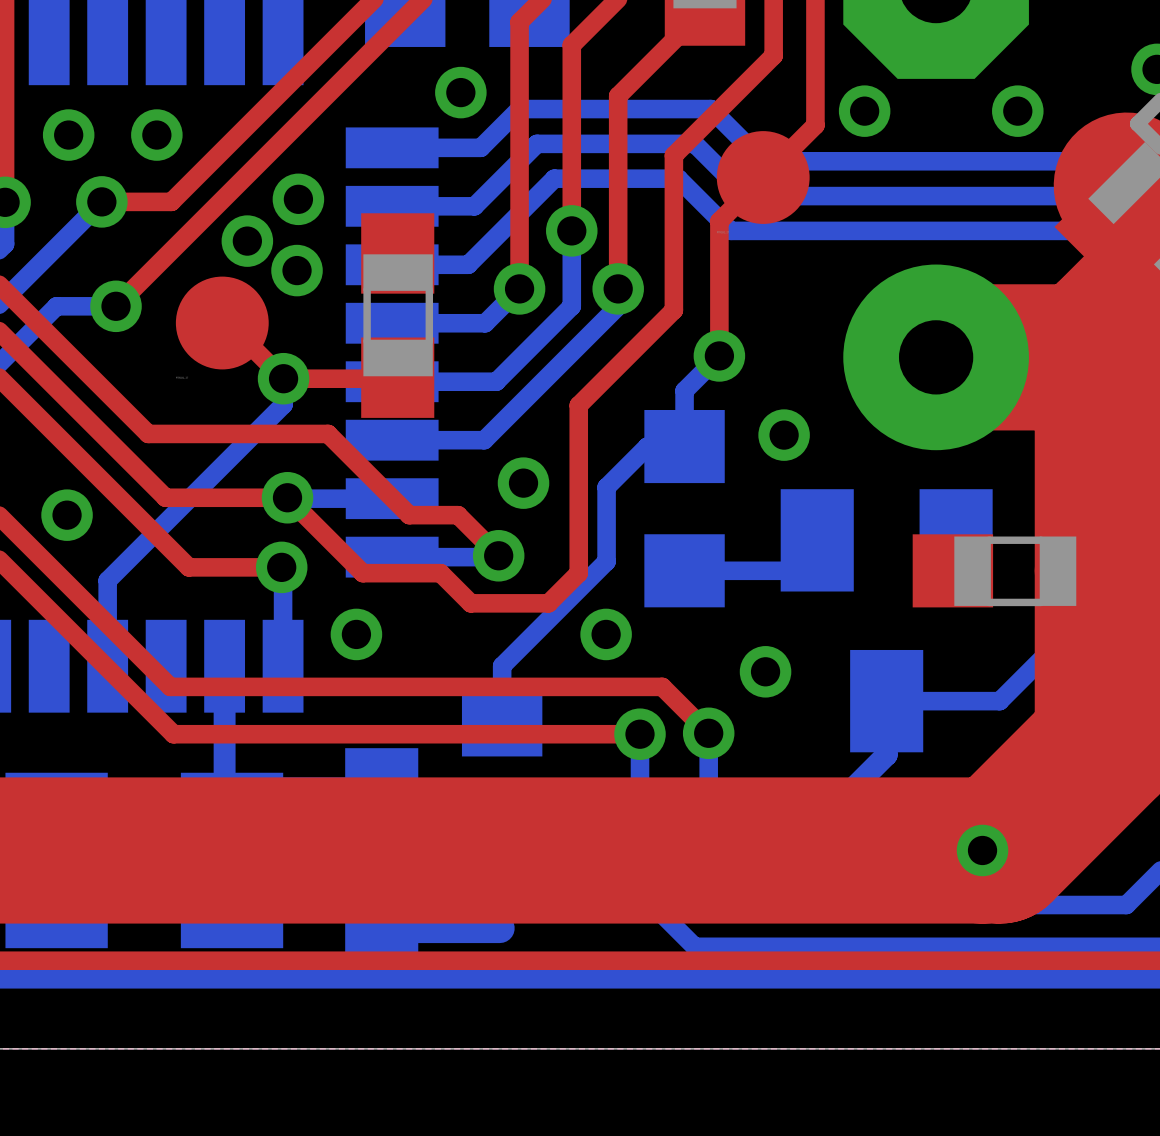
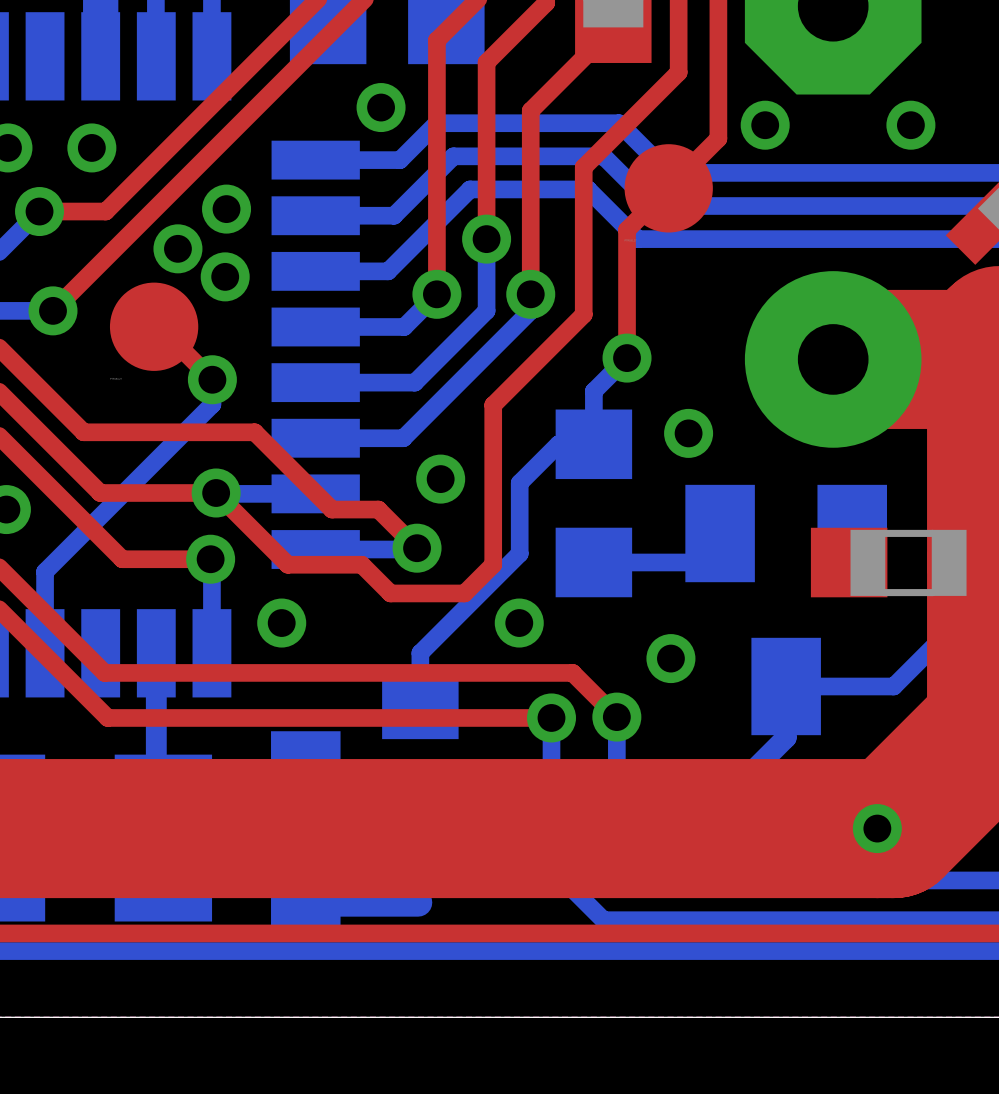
part: (397, 315) -> none
top track: (283, 378) (397, 378) -> none

